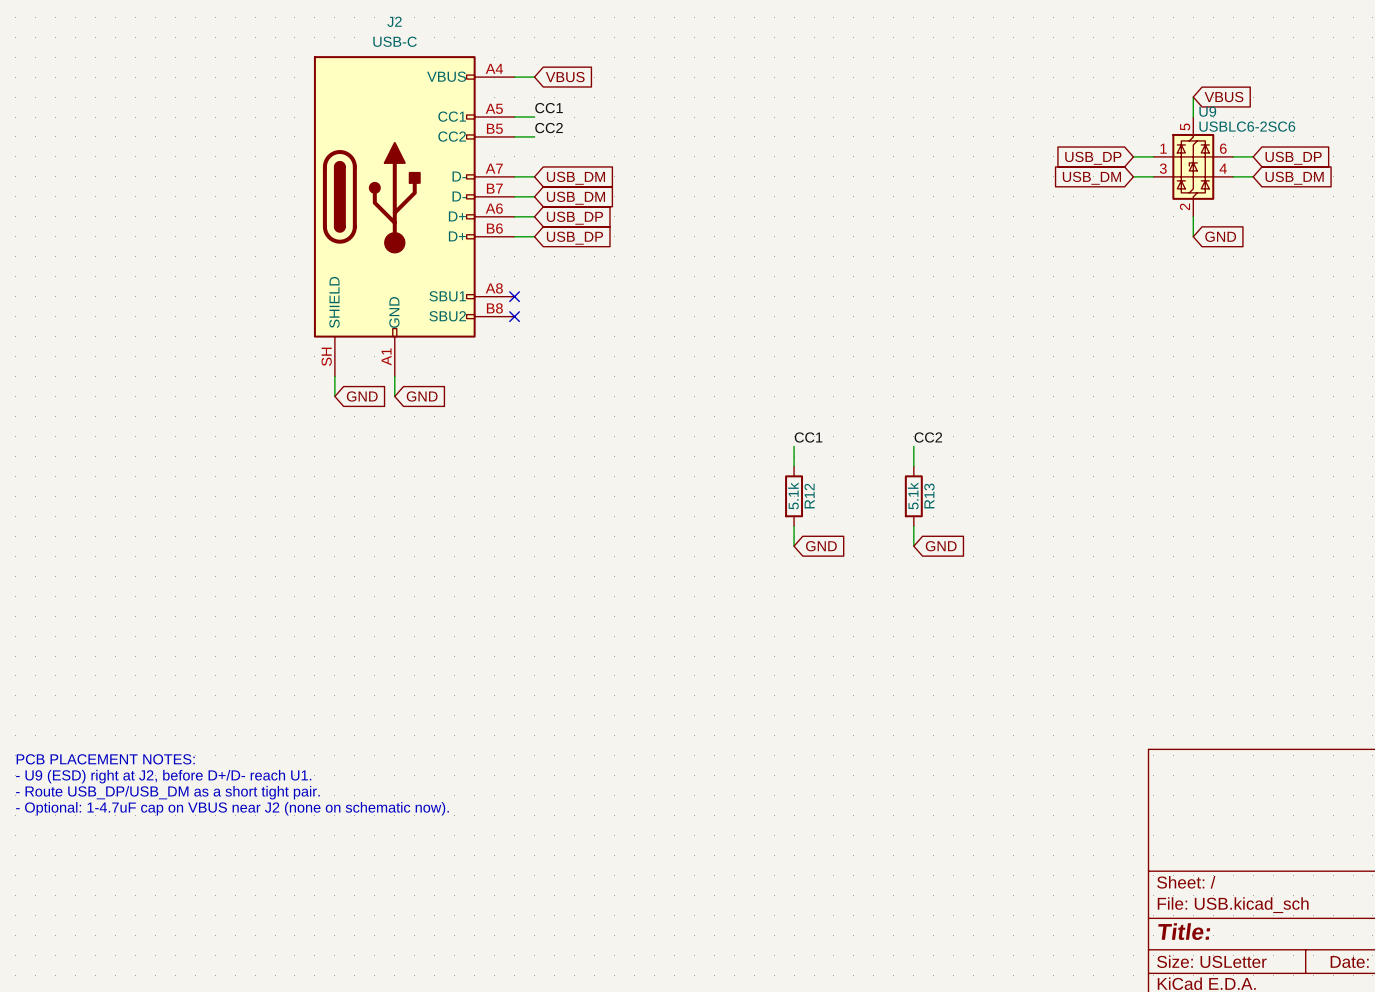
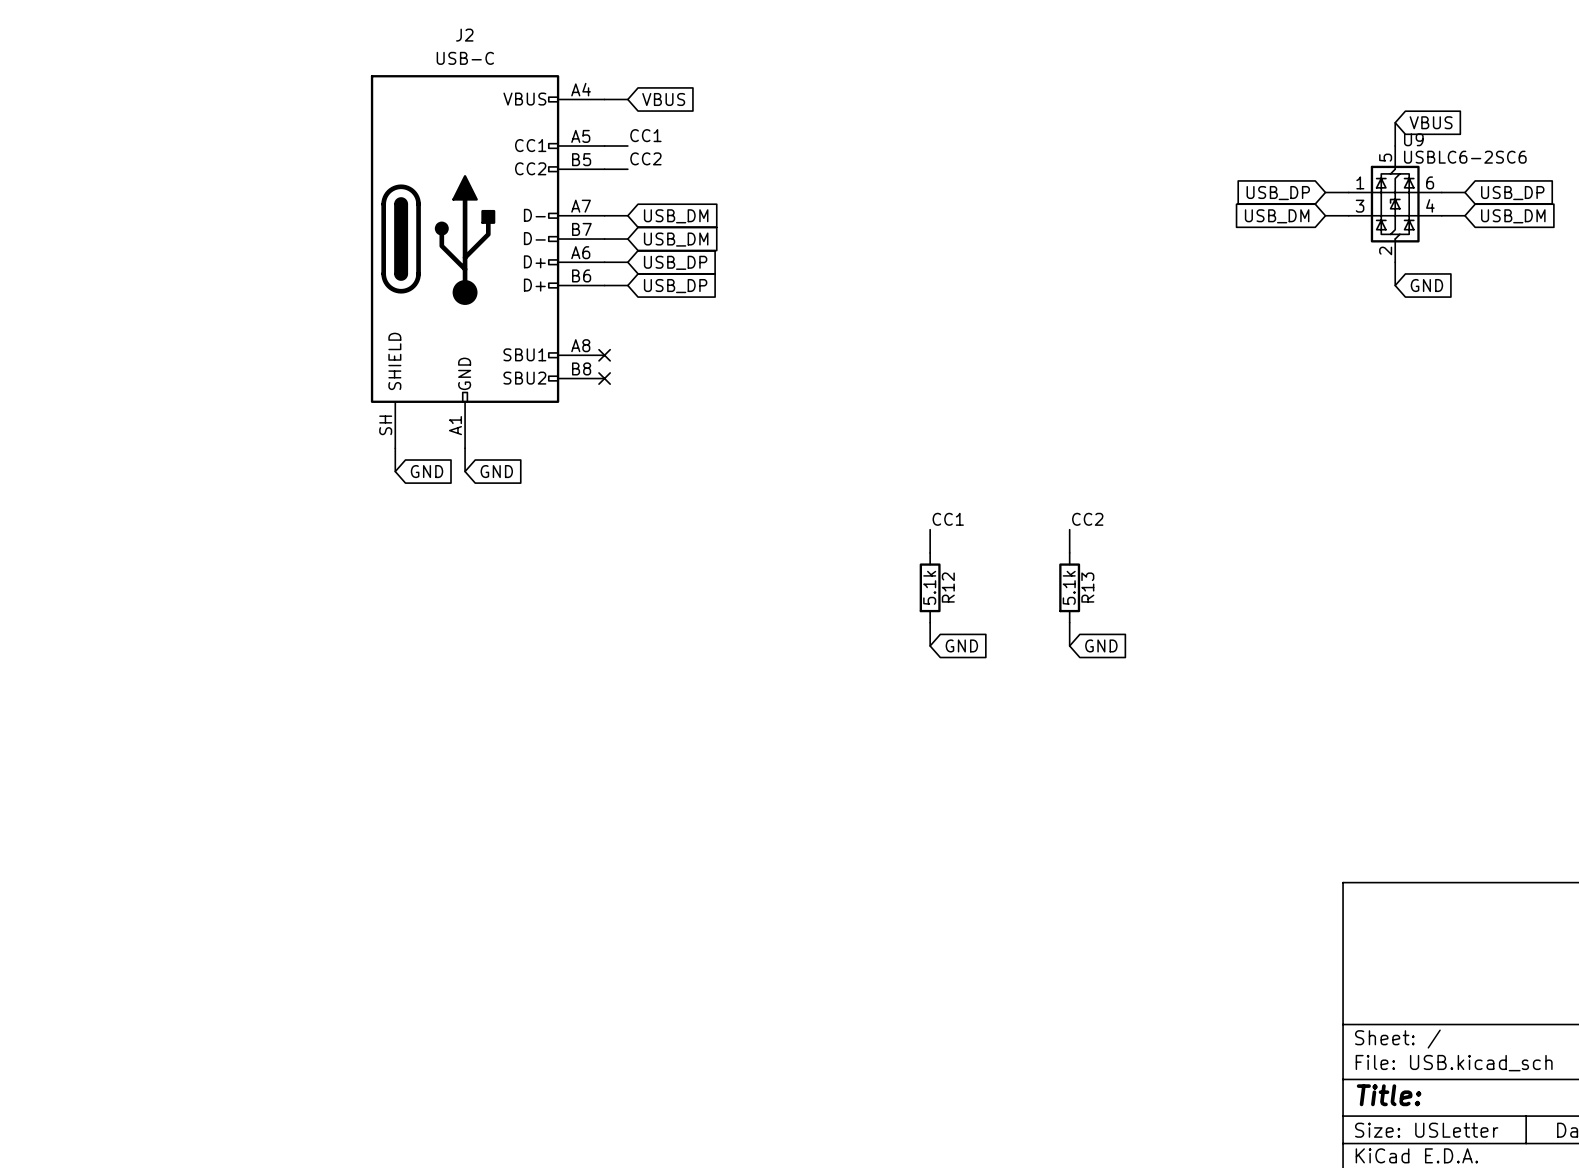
text: PCB PLACEMENT NOTES: (105, 759) -> none
text: - U9 (ESD) right at J2, before D+/D- reach U1. (163, 776) -> none
text: - Route USB_DP/USB_DM as a short tight pair. (167, 792) -> none
text: - Optional: 1-4.7uF cap on VBUS near J2 (none on schematic now). (232, 808) -> none

